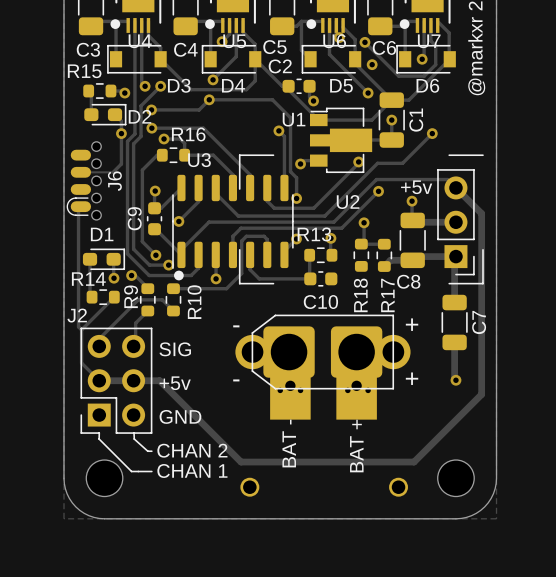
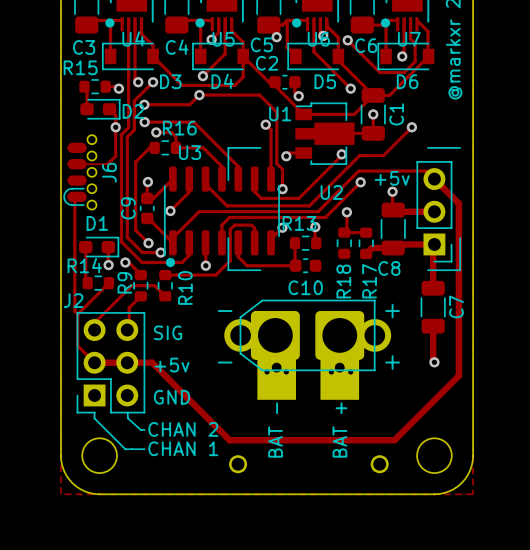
via: none -> (276, 37)
via: (372, 64) -> none

